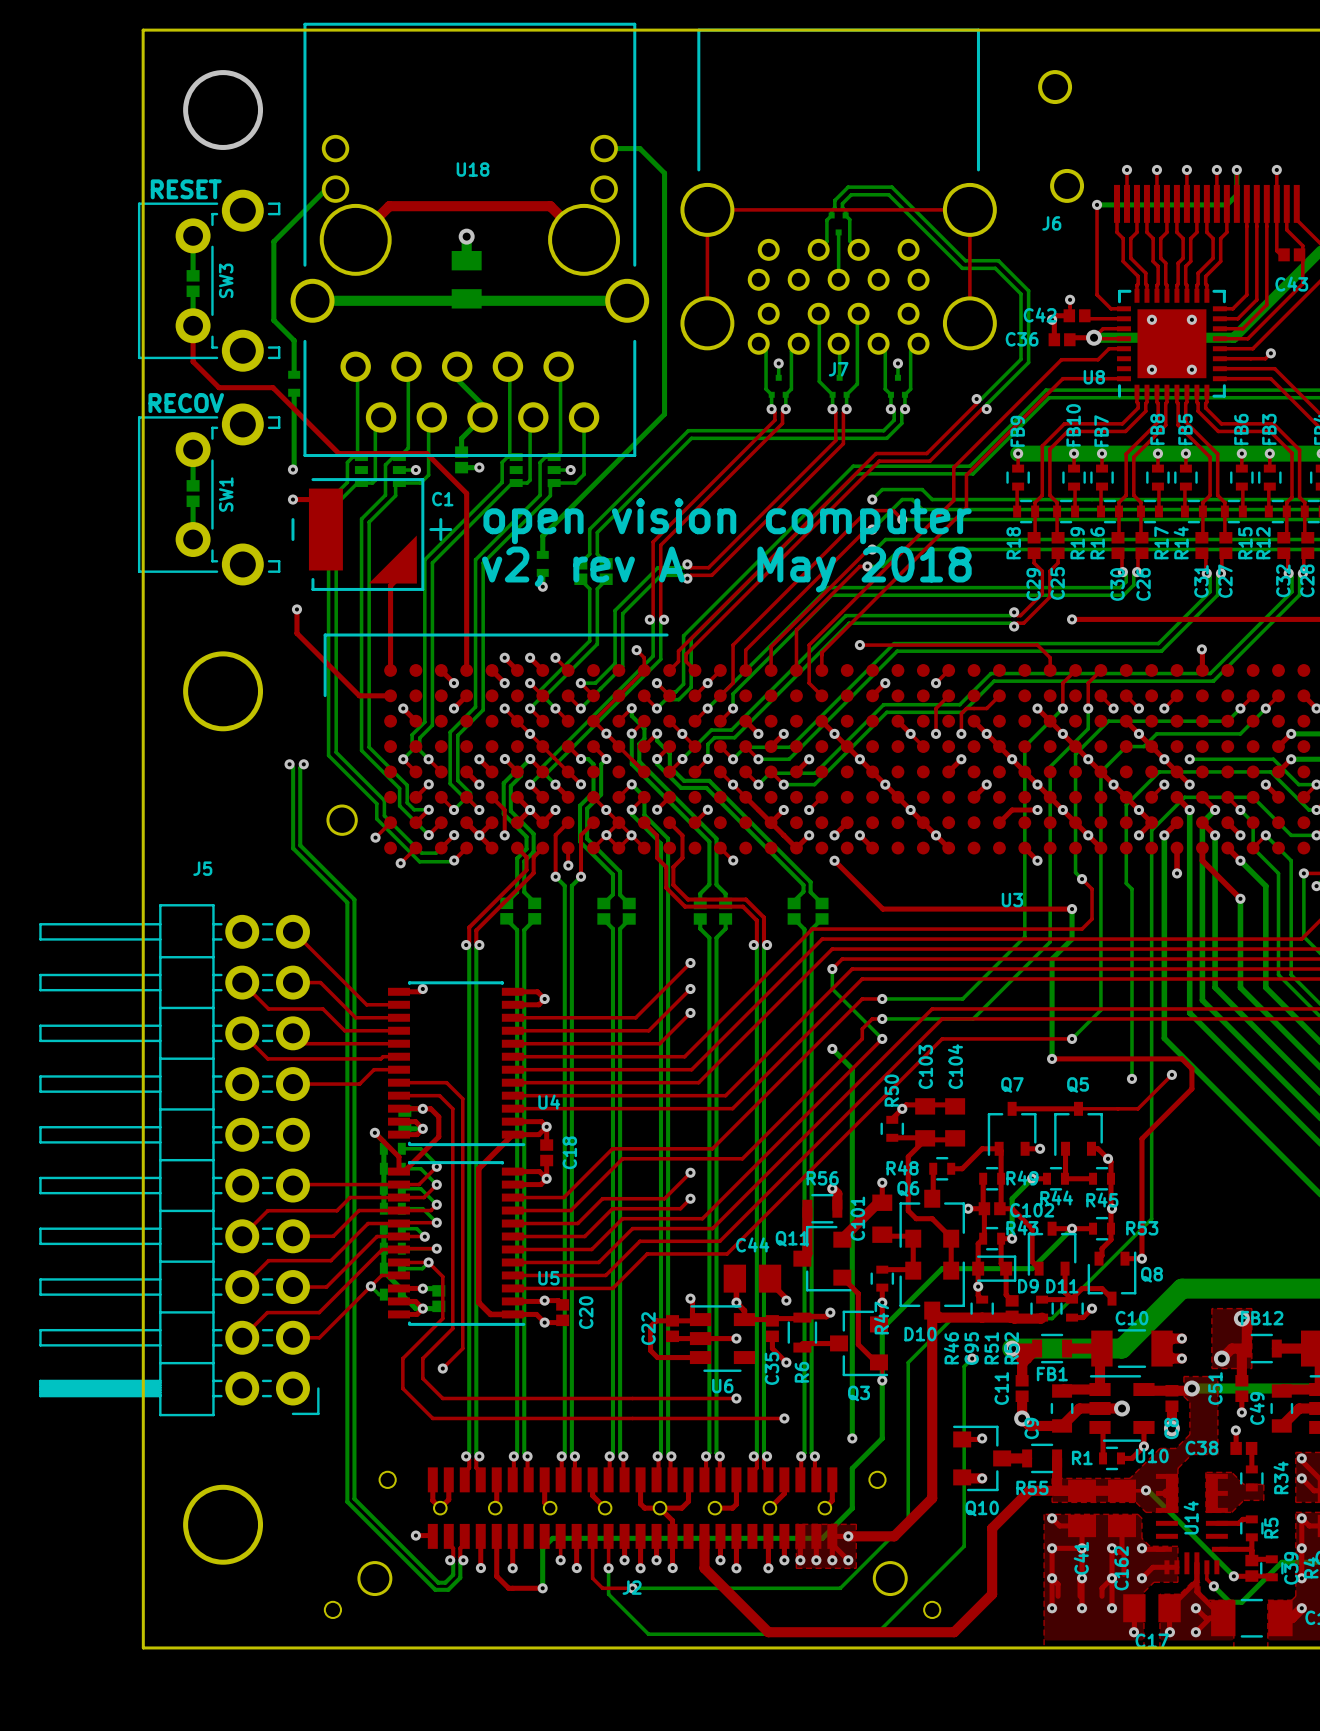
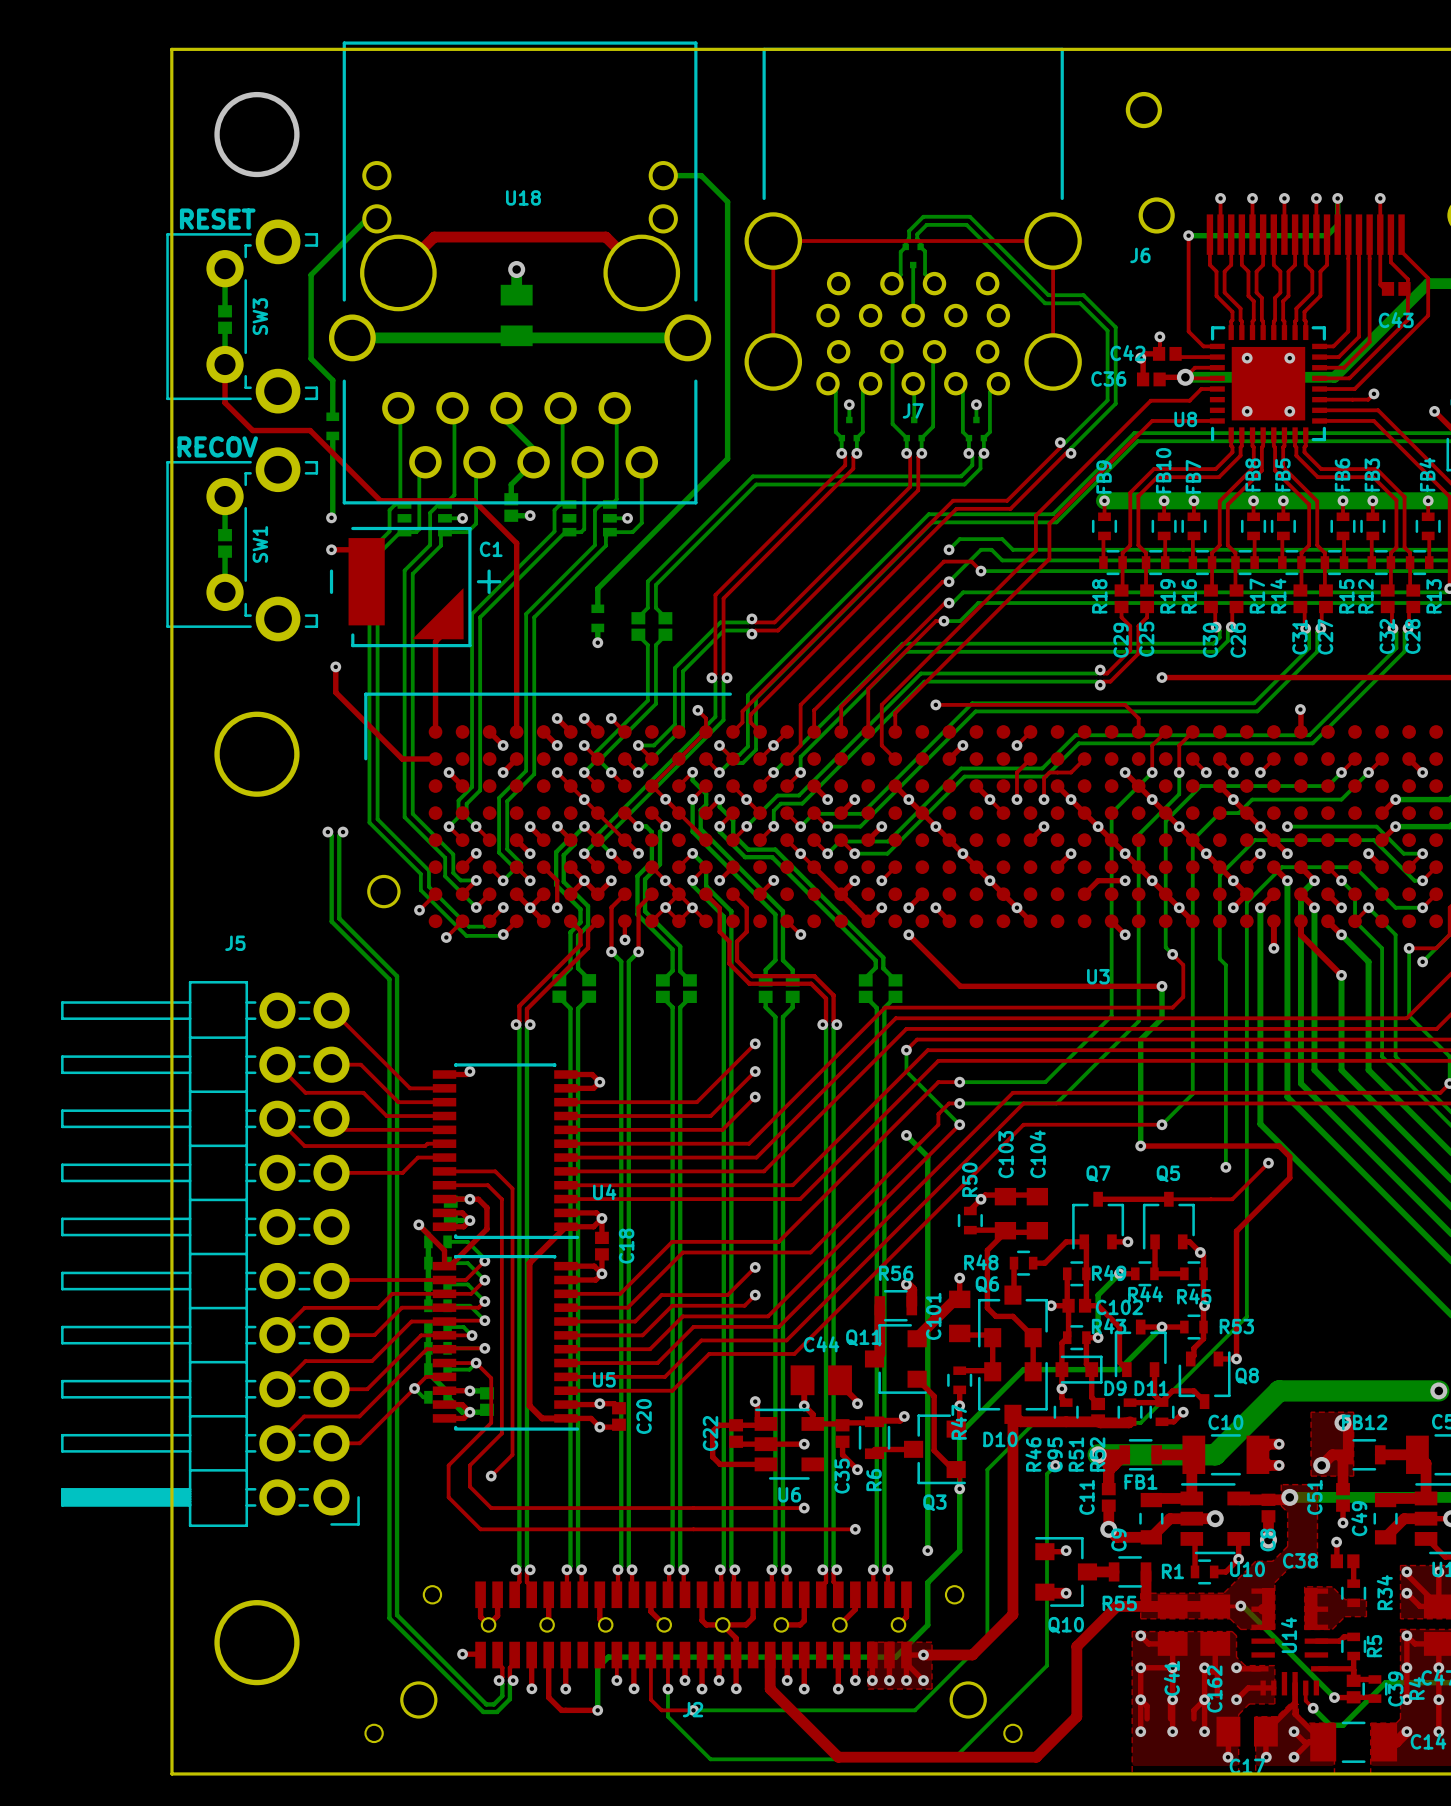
text: open vision computer (727, 521) -> none
text: v2, rev A May 2018 (726, 569) -> none

